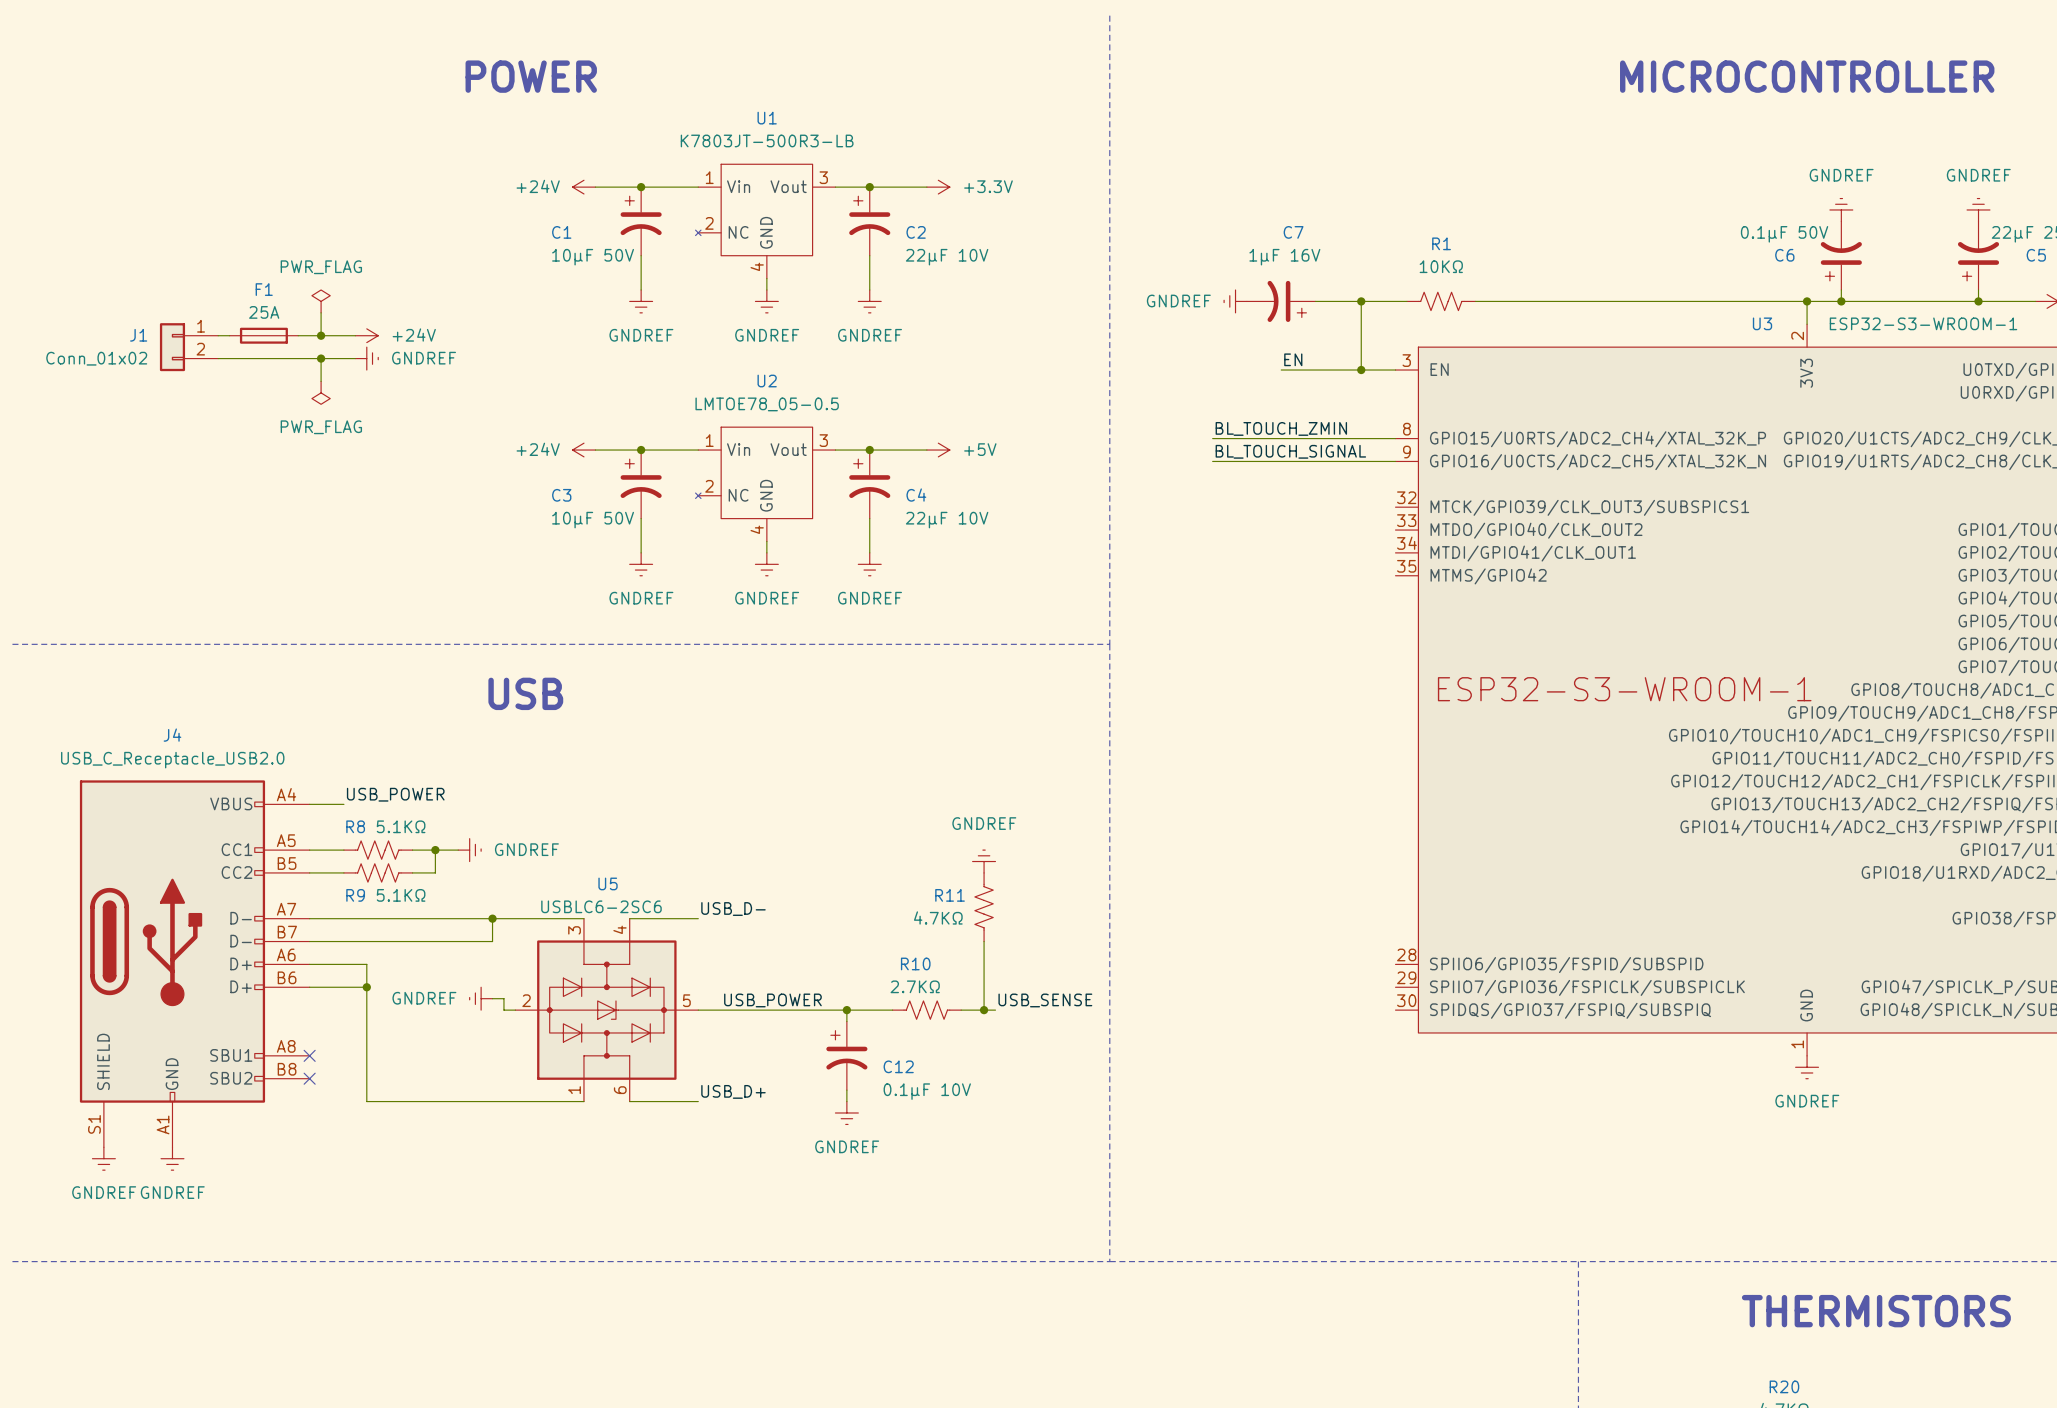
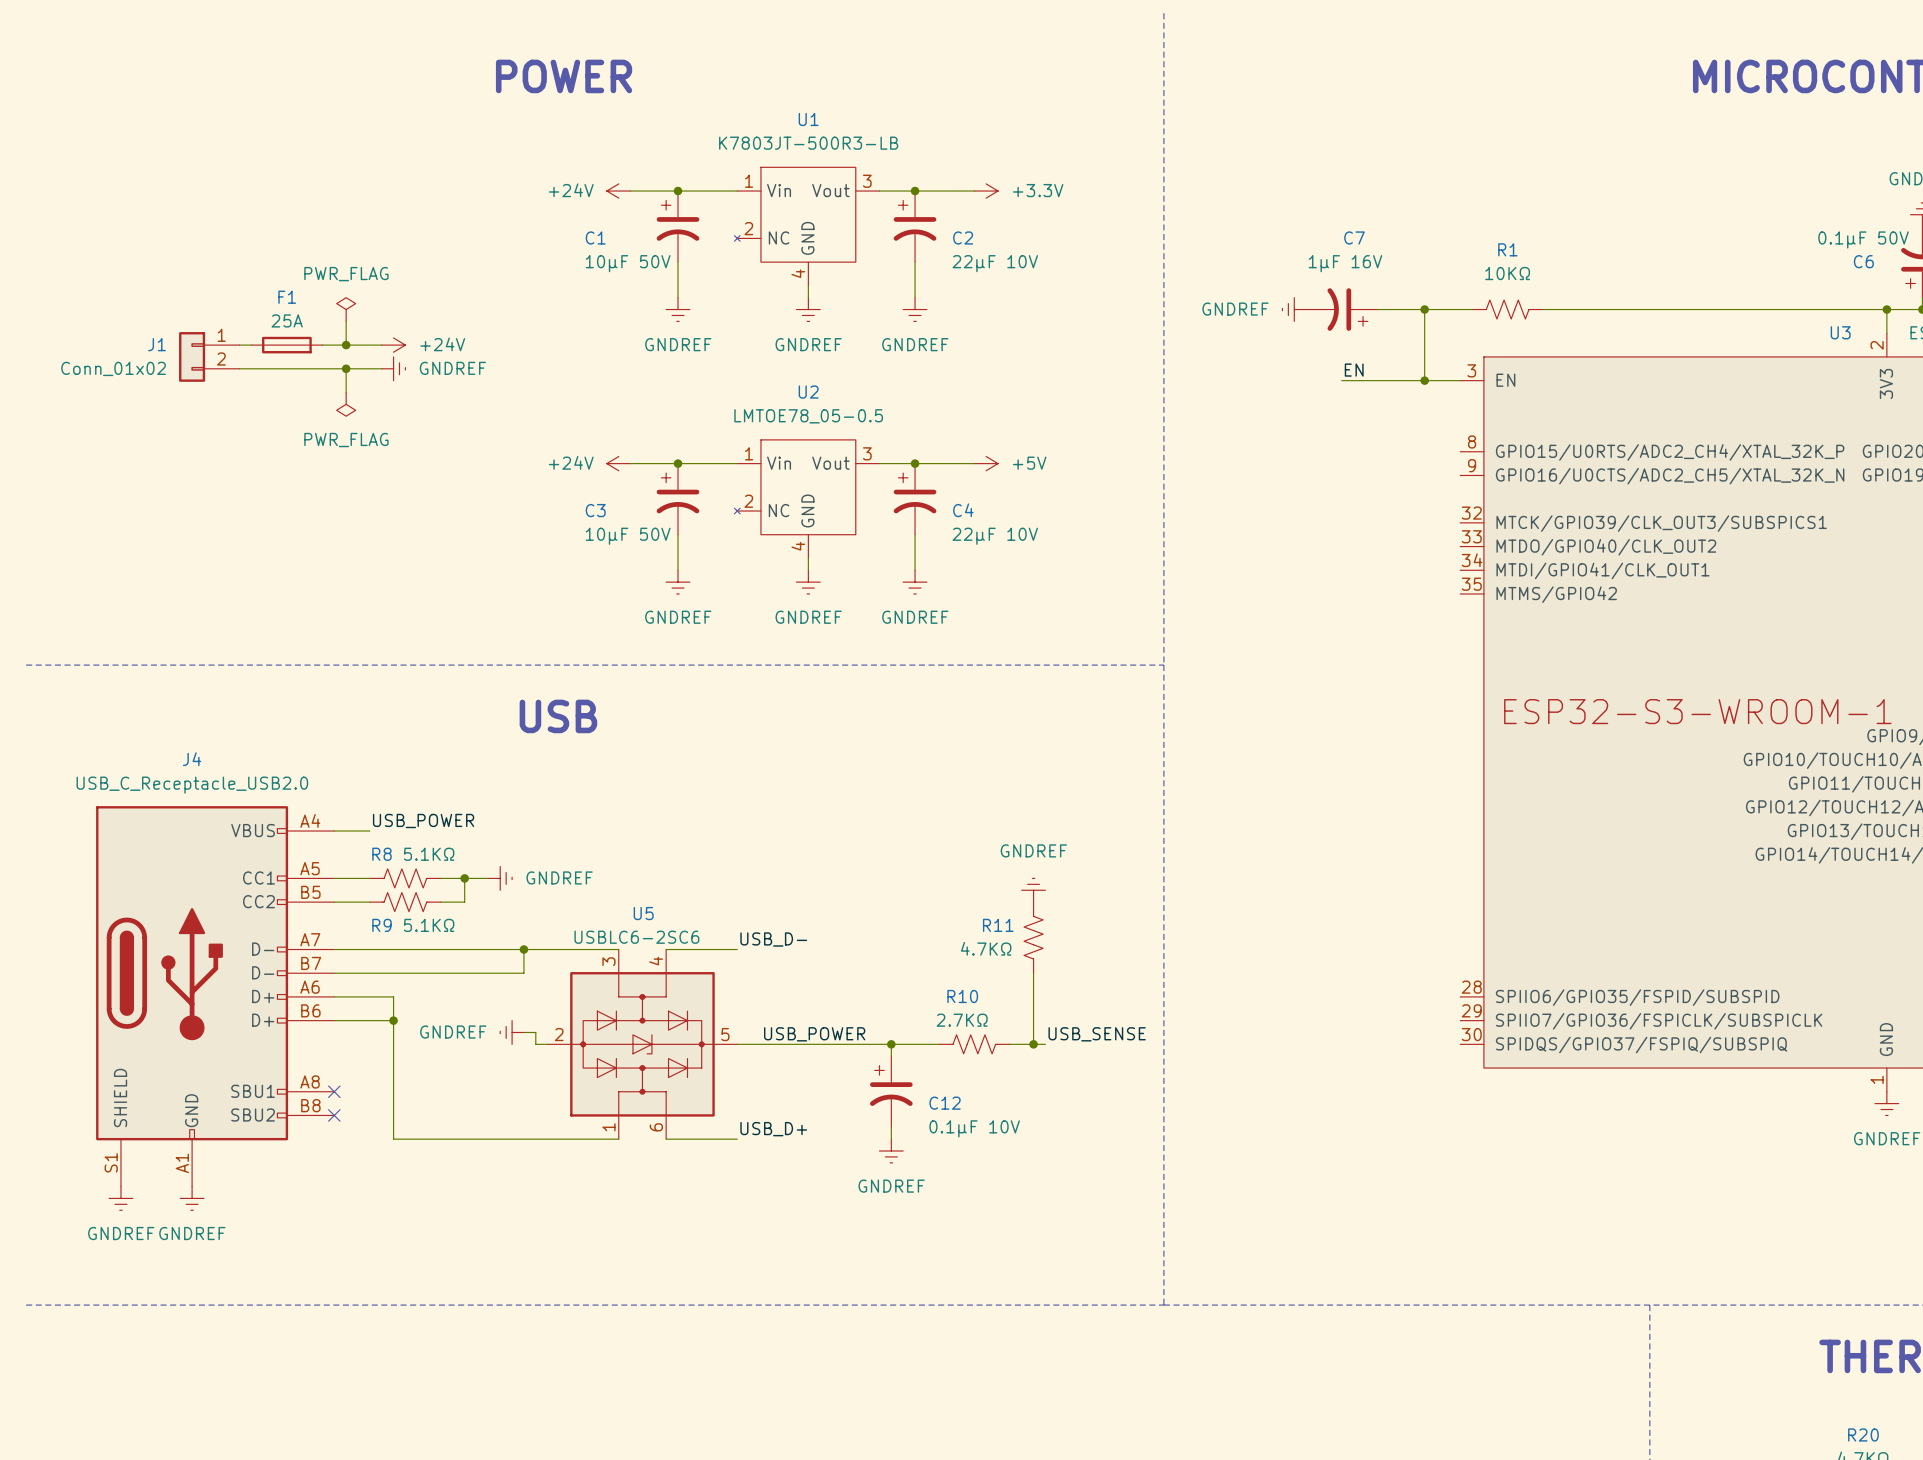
label: BL_TOUCH_ZMIN (1281, 428) -> none
wire: (1212, 438) (1395, 438) -> none
label: BL_TOUCH_SIGNAL (1290, 451) -> none
wire: (1212, 461) (1395, 461) -> none

